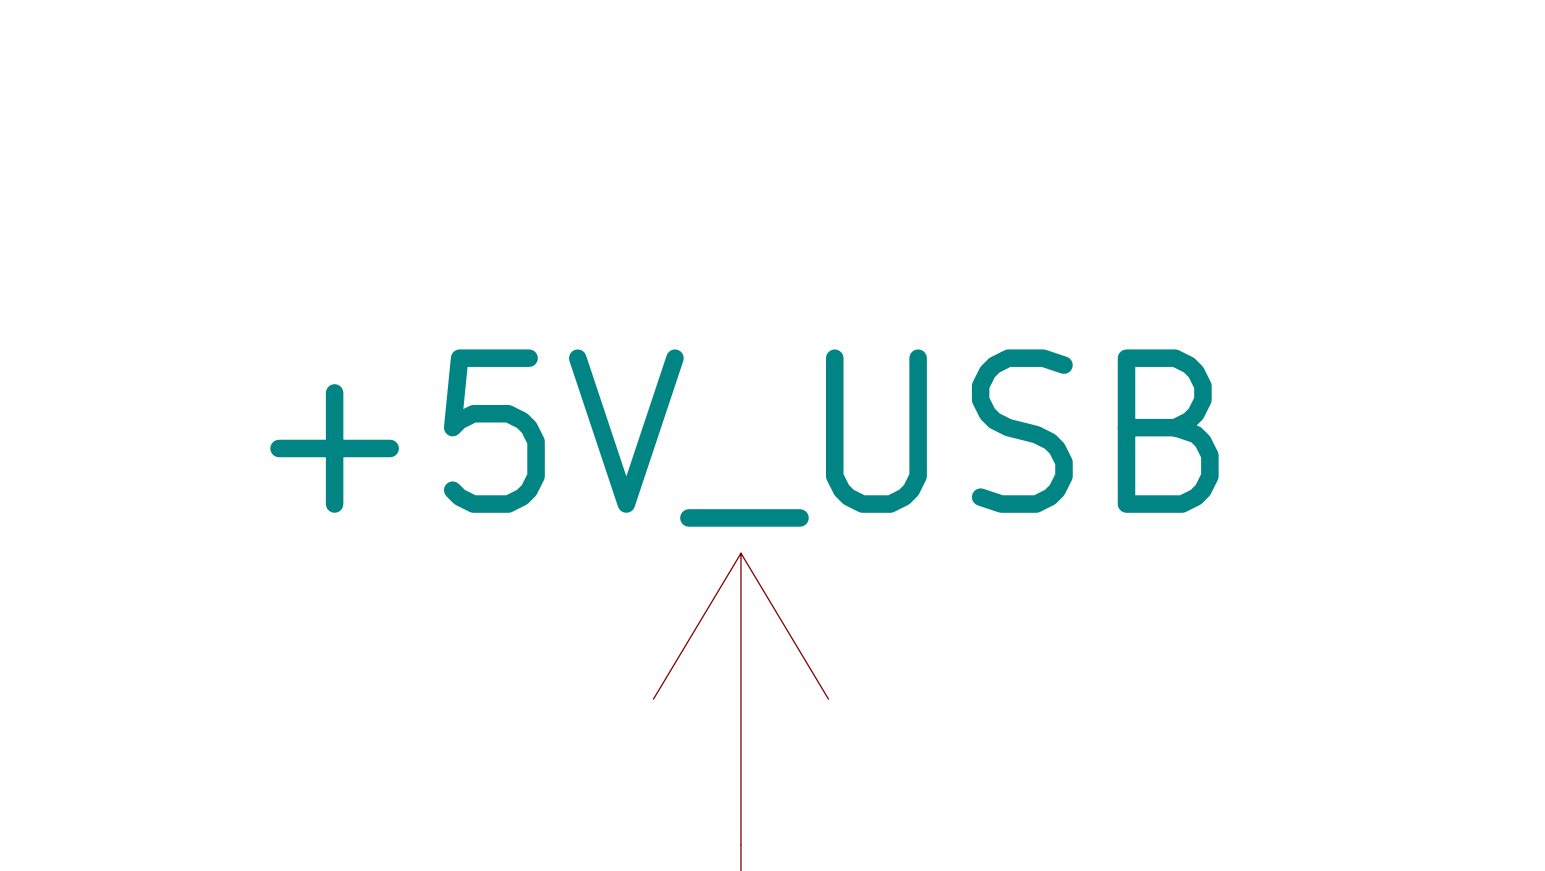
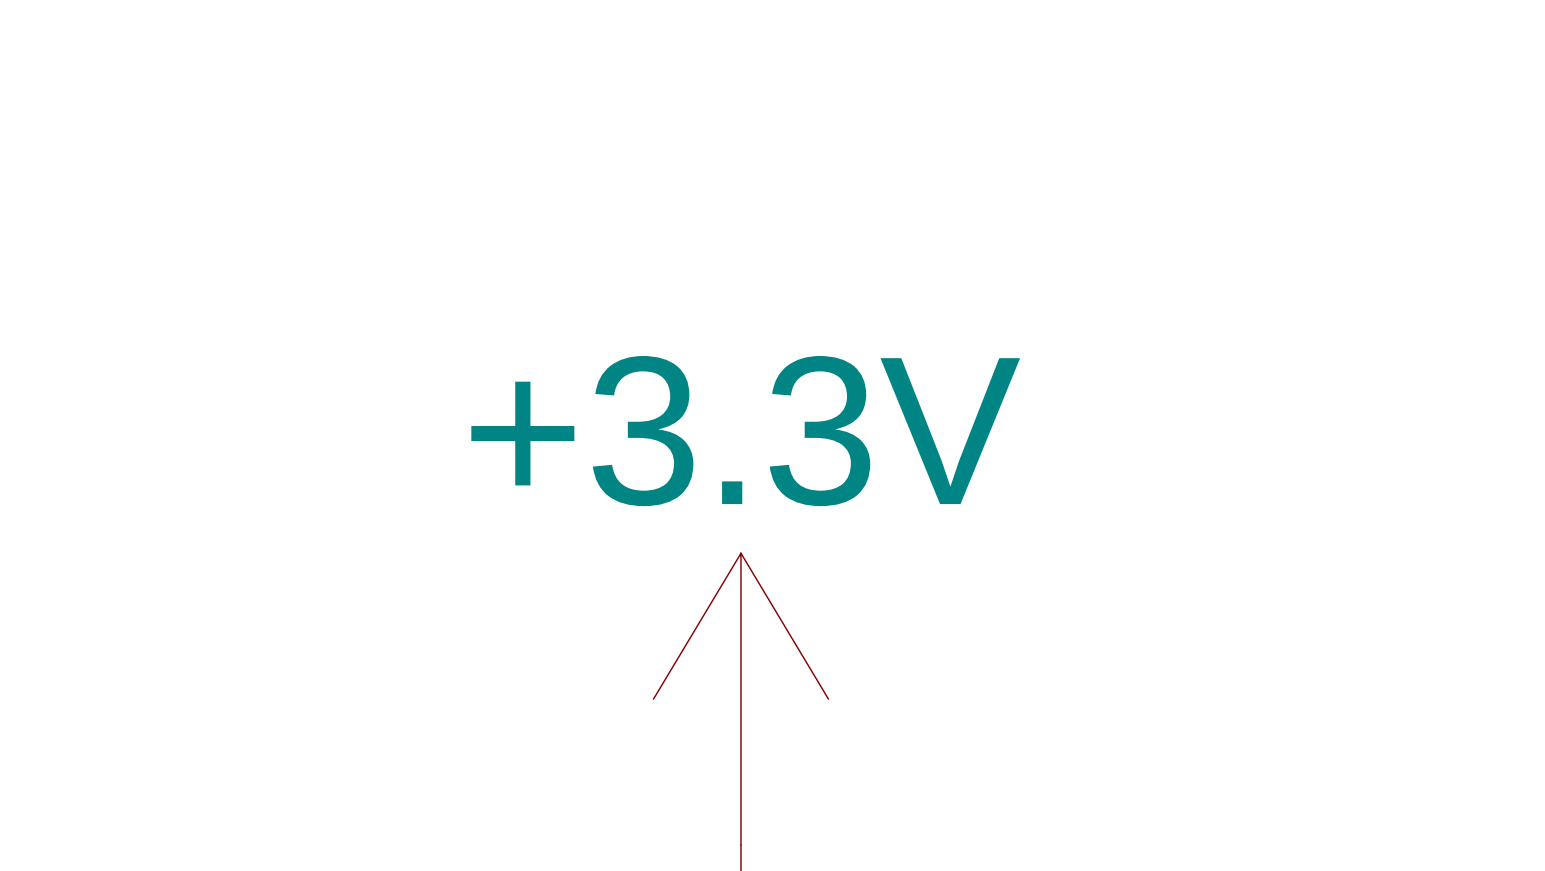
power symbol: +5V_USB (740, 699) -> +3.3V (740, 699)

